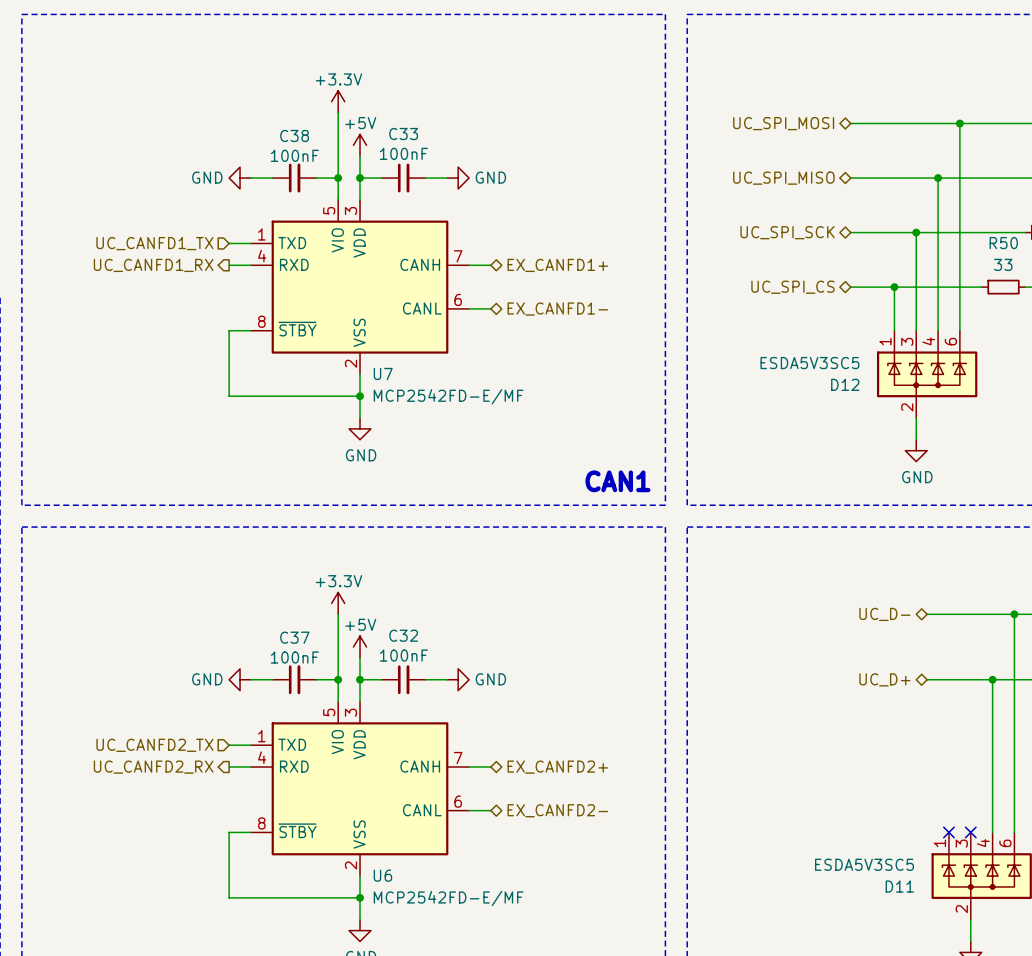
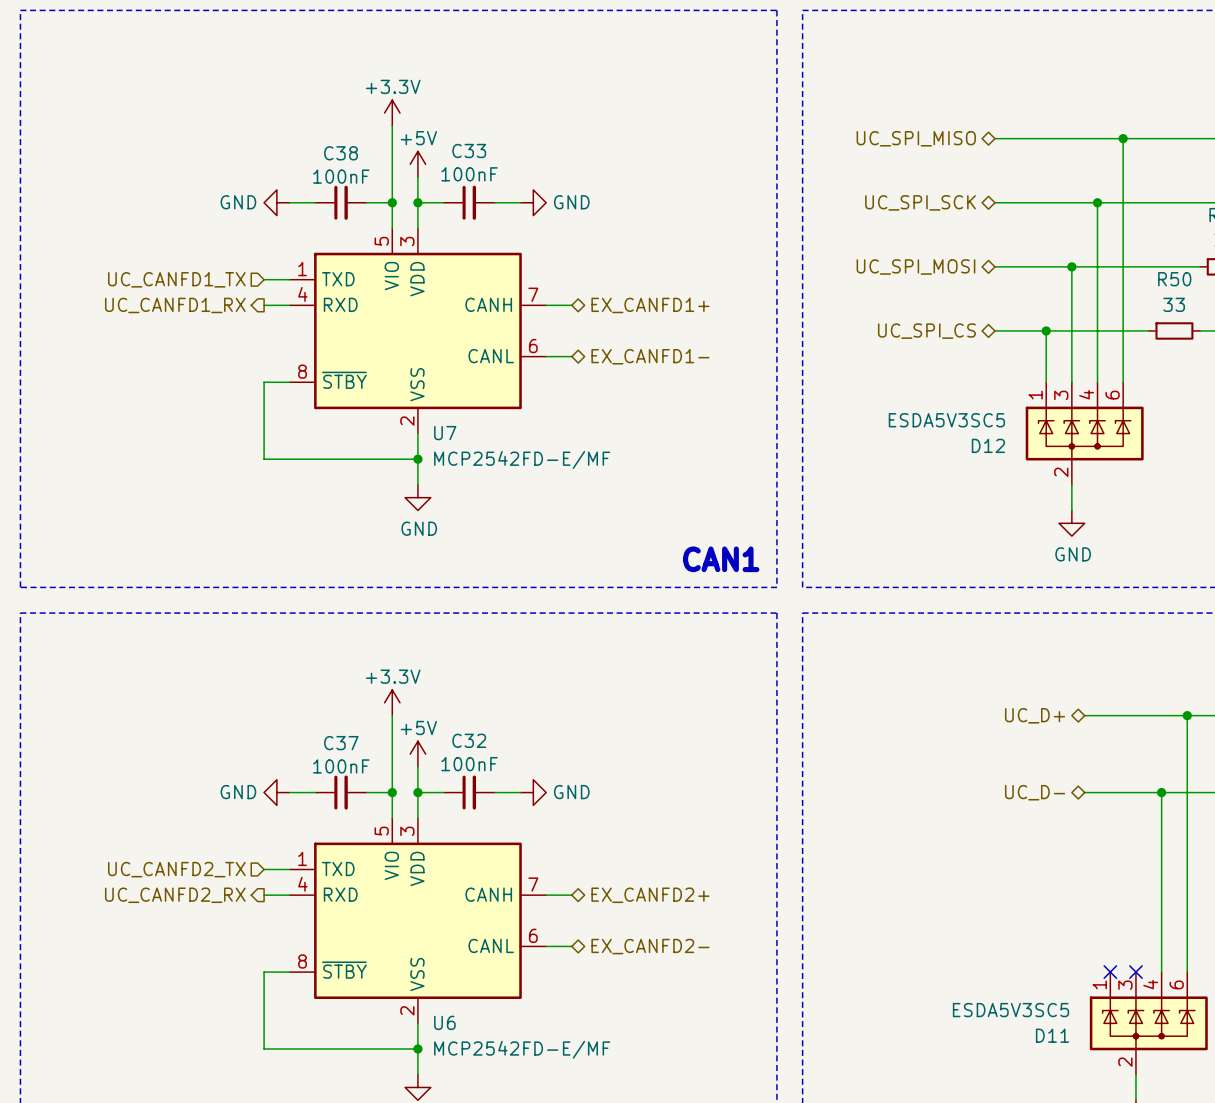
hierarchical label: UC_SPI_MOSI (783, 123) -> UC_SPI_MISO (916, 138)
hierarchical label: UC_SPI_MISO (783, 178) -> UC_SPI_SCK (920, 202)
hierarchical label: UC_SPI_SCK (787, 232) -> UC_SPI_MOSI (915, 266)
hierarchical label: UC_D- (884, 614) -> UC_D+ (1035, 715)
hierarchical label: UC_D+ (884, 679) -> UC_D- (1035, 792)

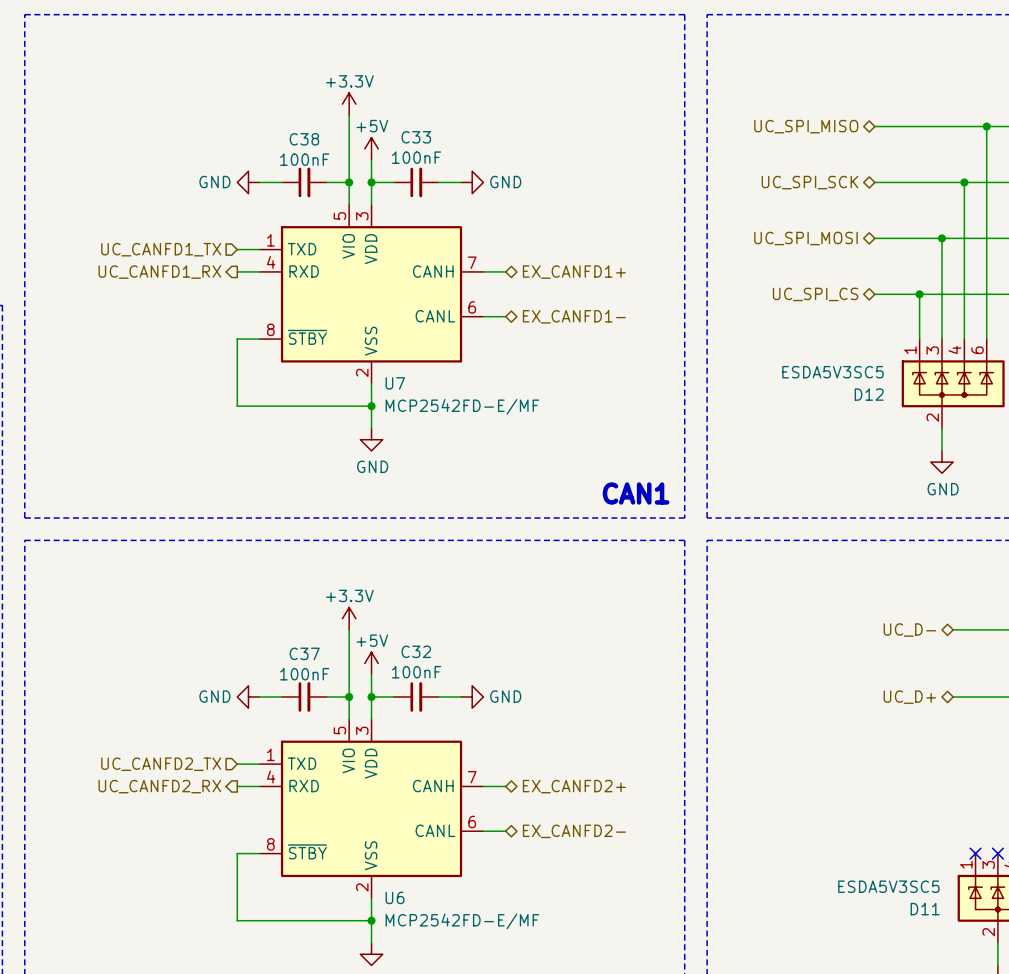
hierarchical label: UC_D+ (1035, 715) -> UC_D- (909, 629)
hierarchical label: UC_D- (1035, 792) -> UC_D+ (909, 697)

